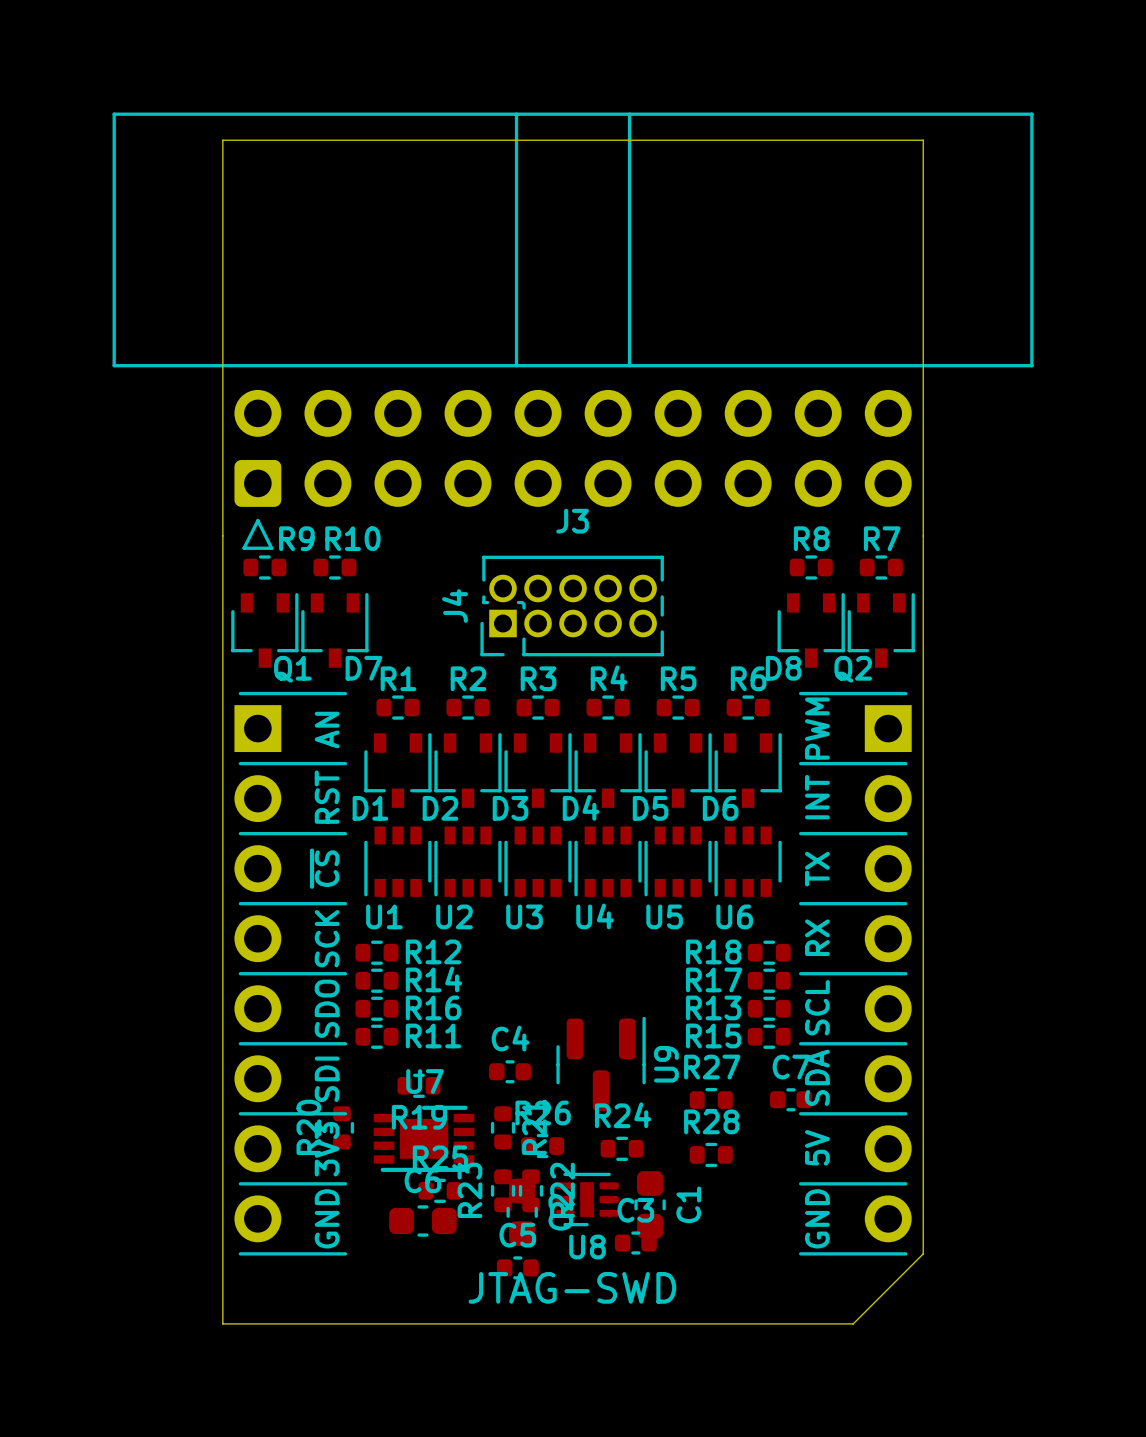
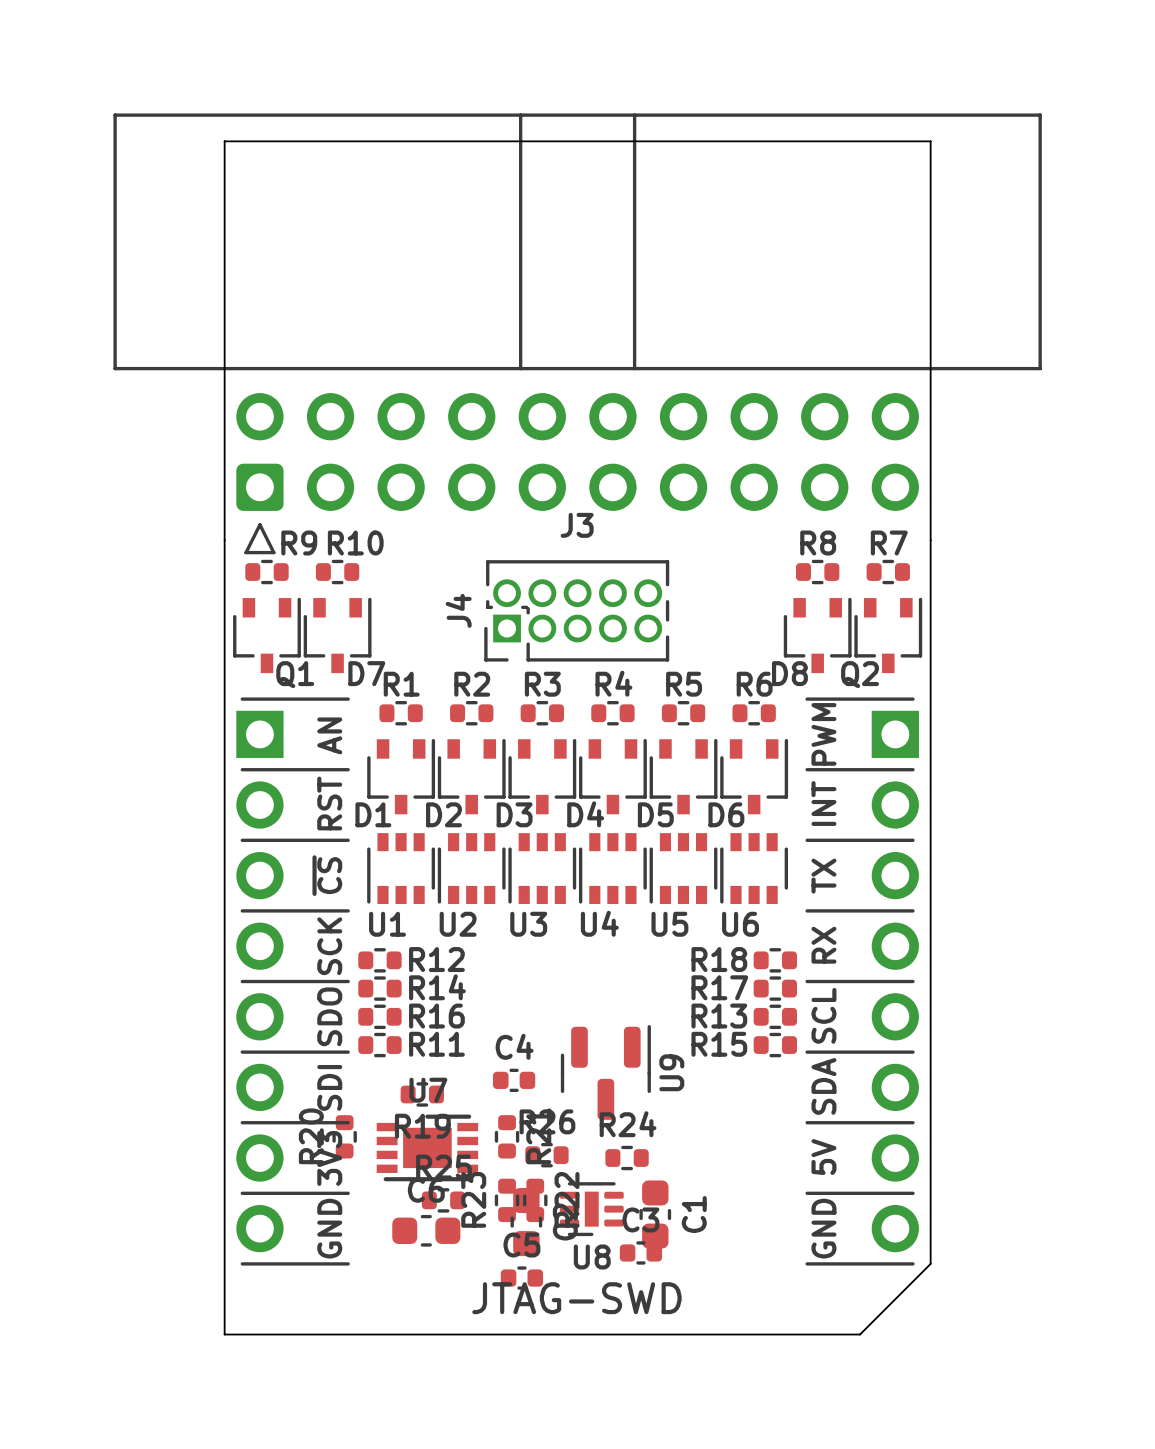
C7: (790, 1099) -> none
R27: (711, 1100) -> none
R28: (711, 1154) -> none

